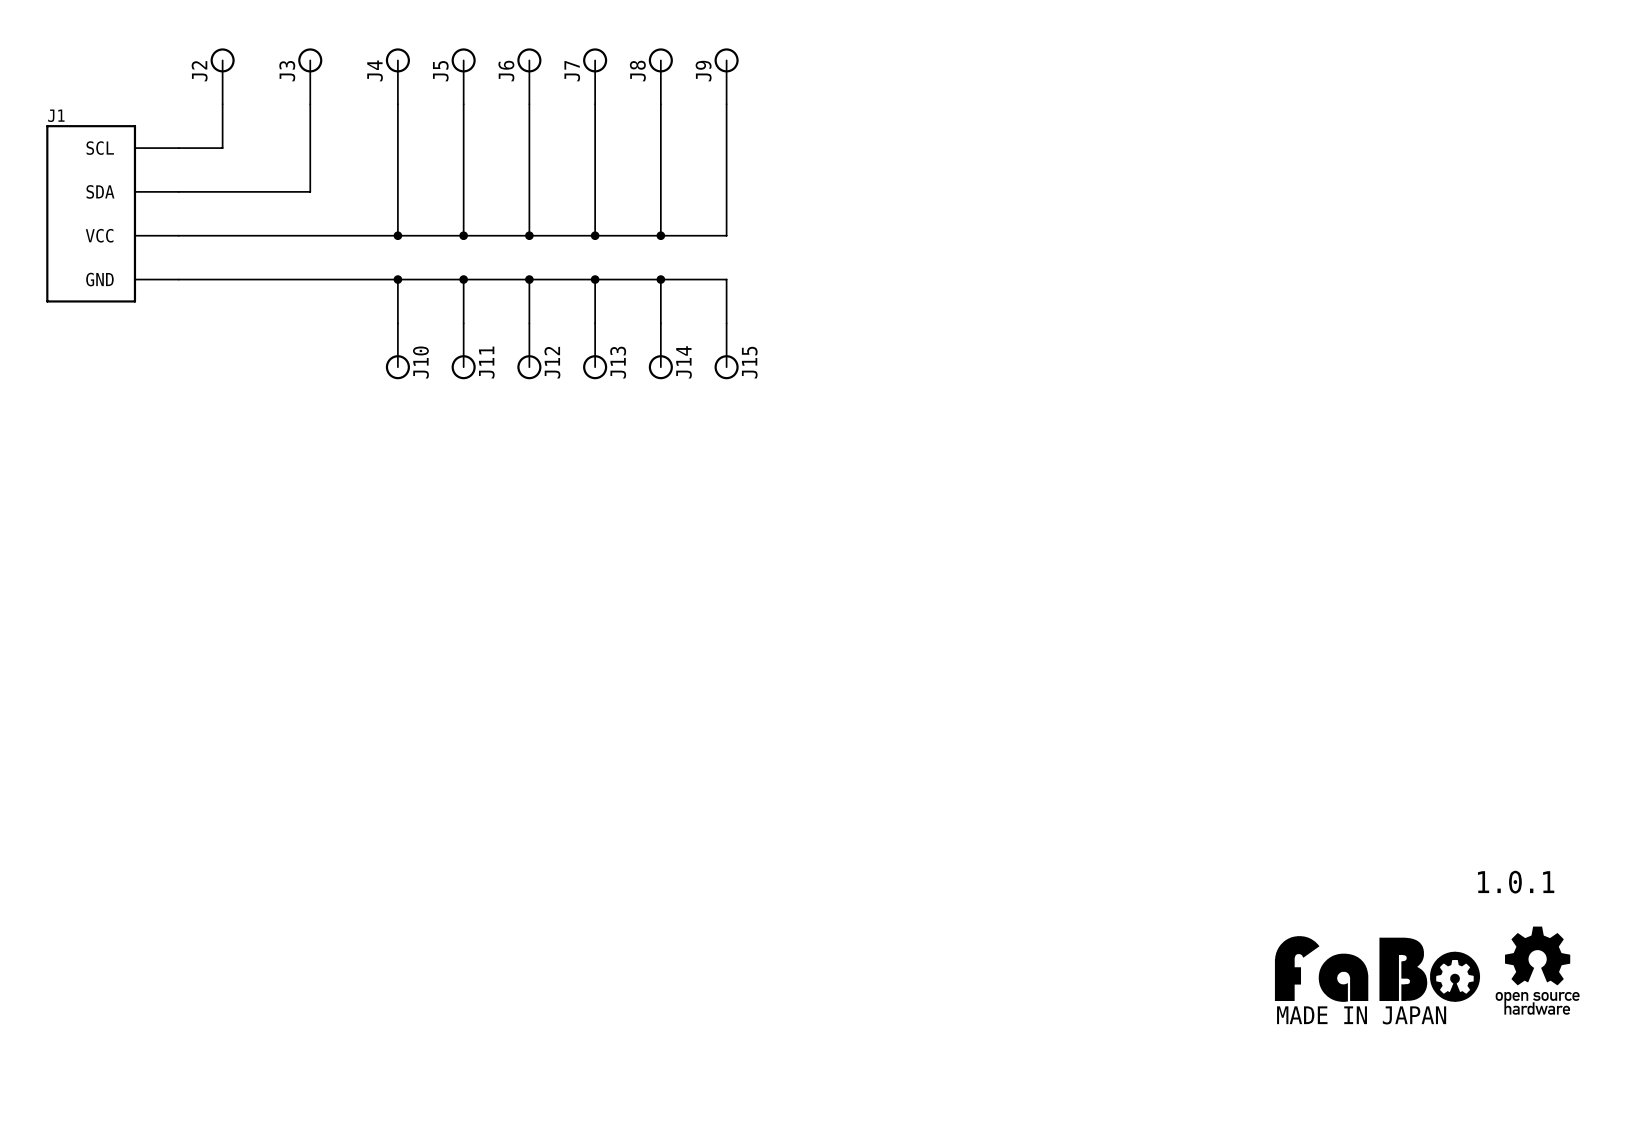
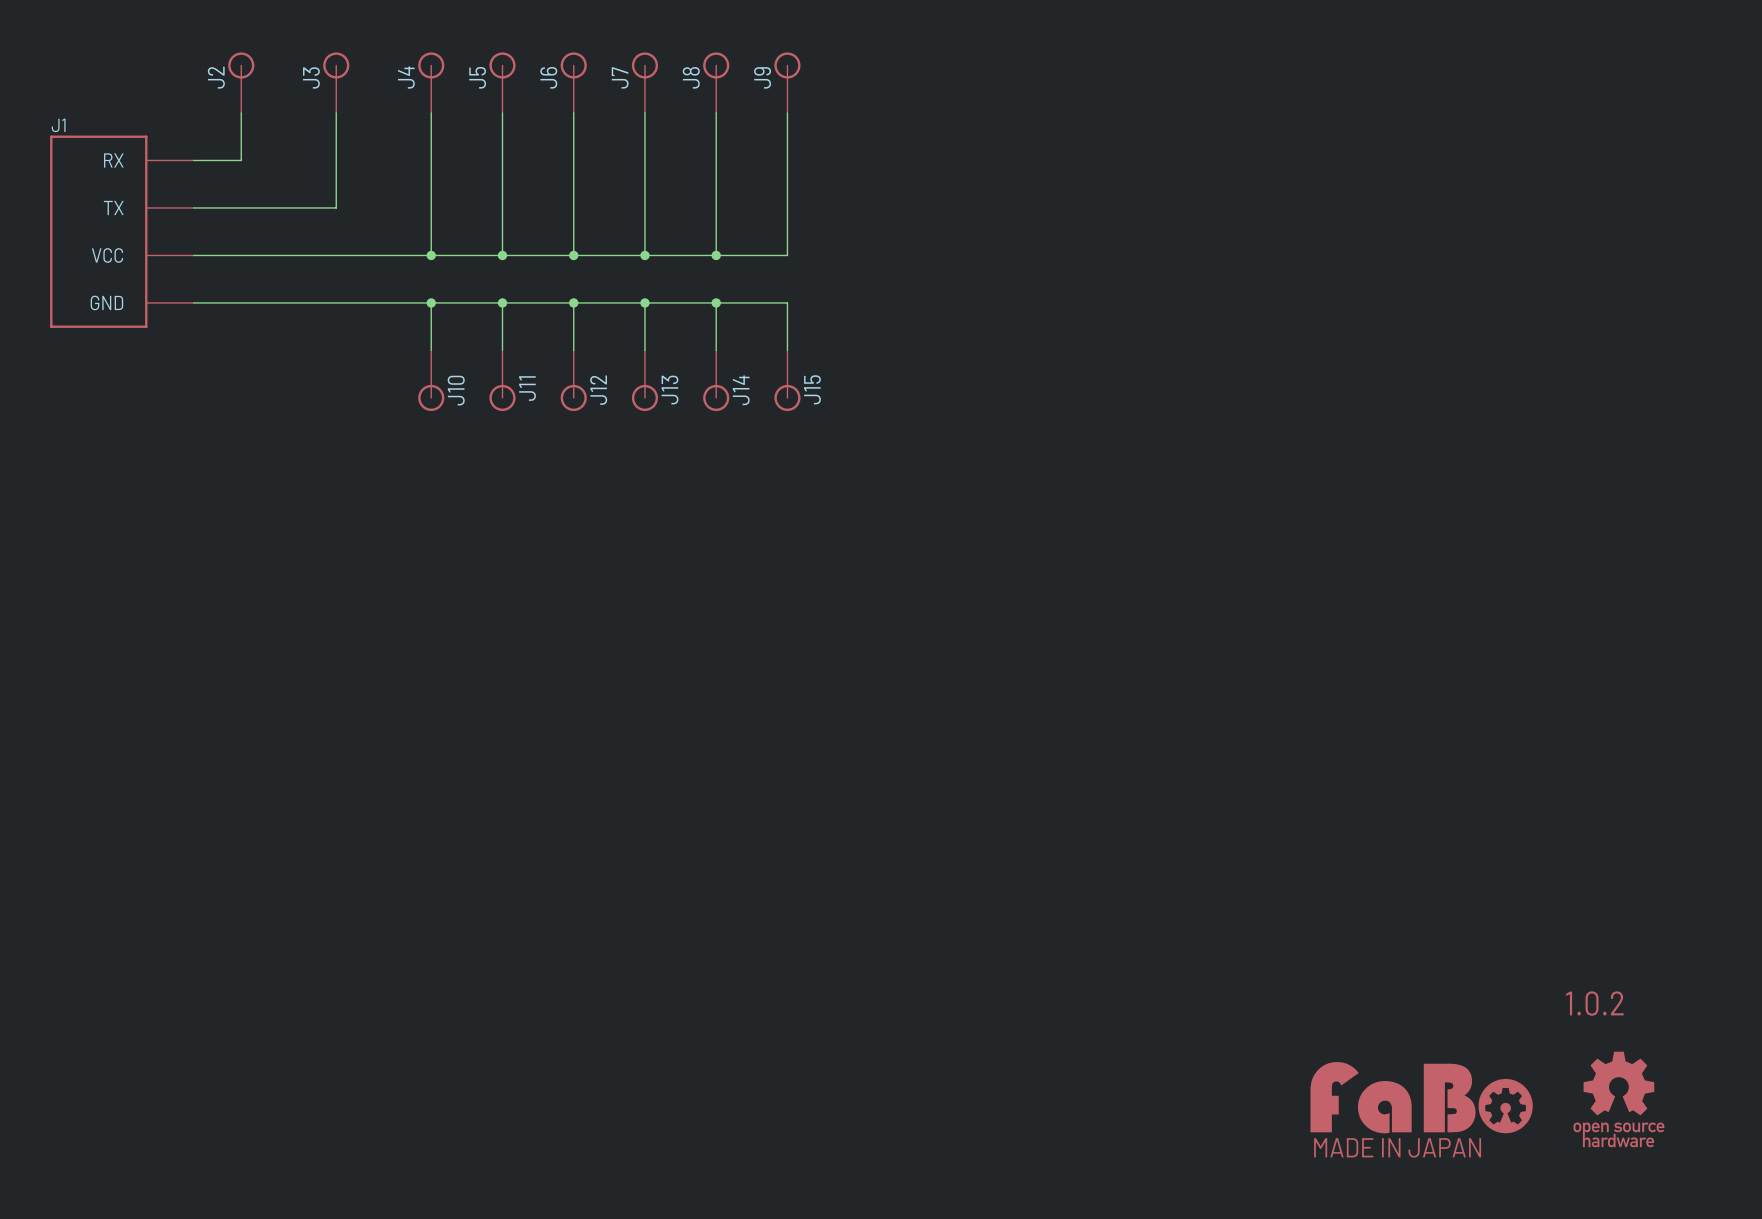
J1 pin name: SCL (100, 148) -> RX (113, 160)
J1 pin name: SDA (100, 191) -> TX (113, 207)
text: 1.0.1 (1516, 882) -> 1.0.2 (1594, 1003)
part position: (1377, 969) -> (1421, 1097)
part position: (1537, 970) -> (1618, 1099)

